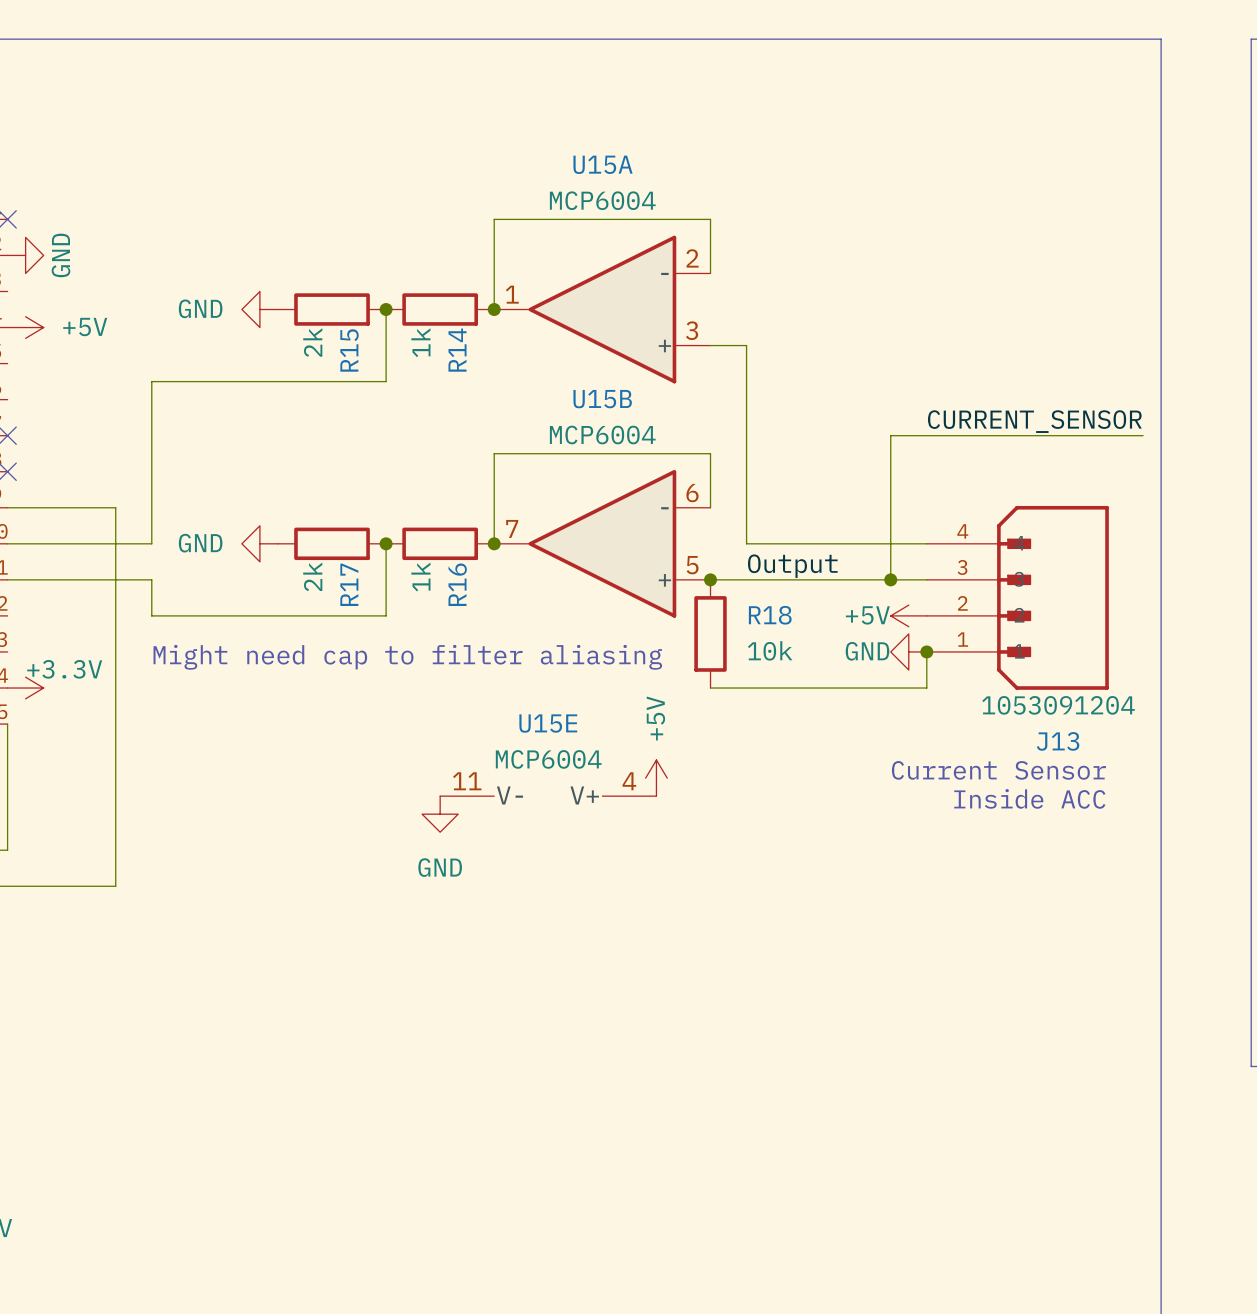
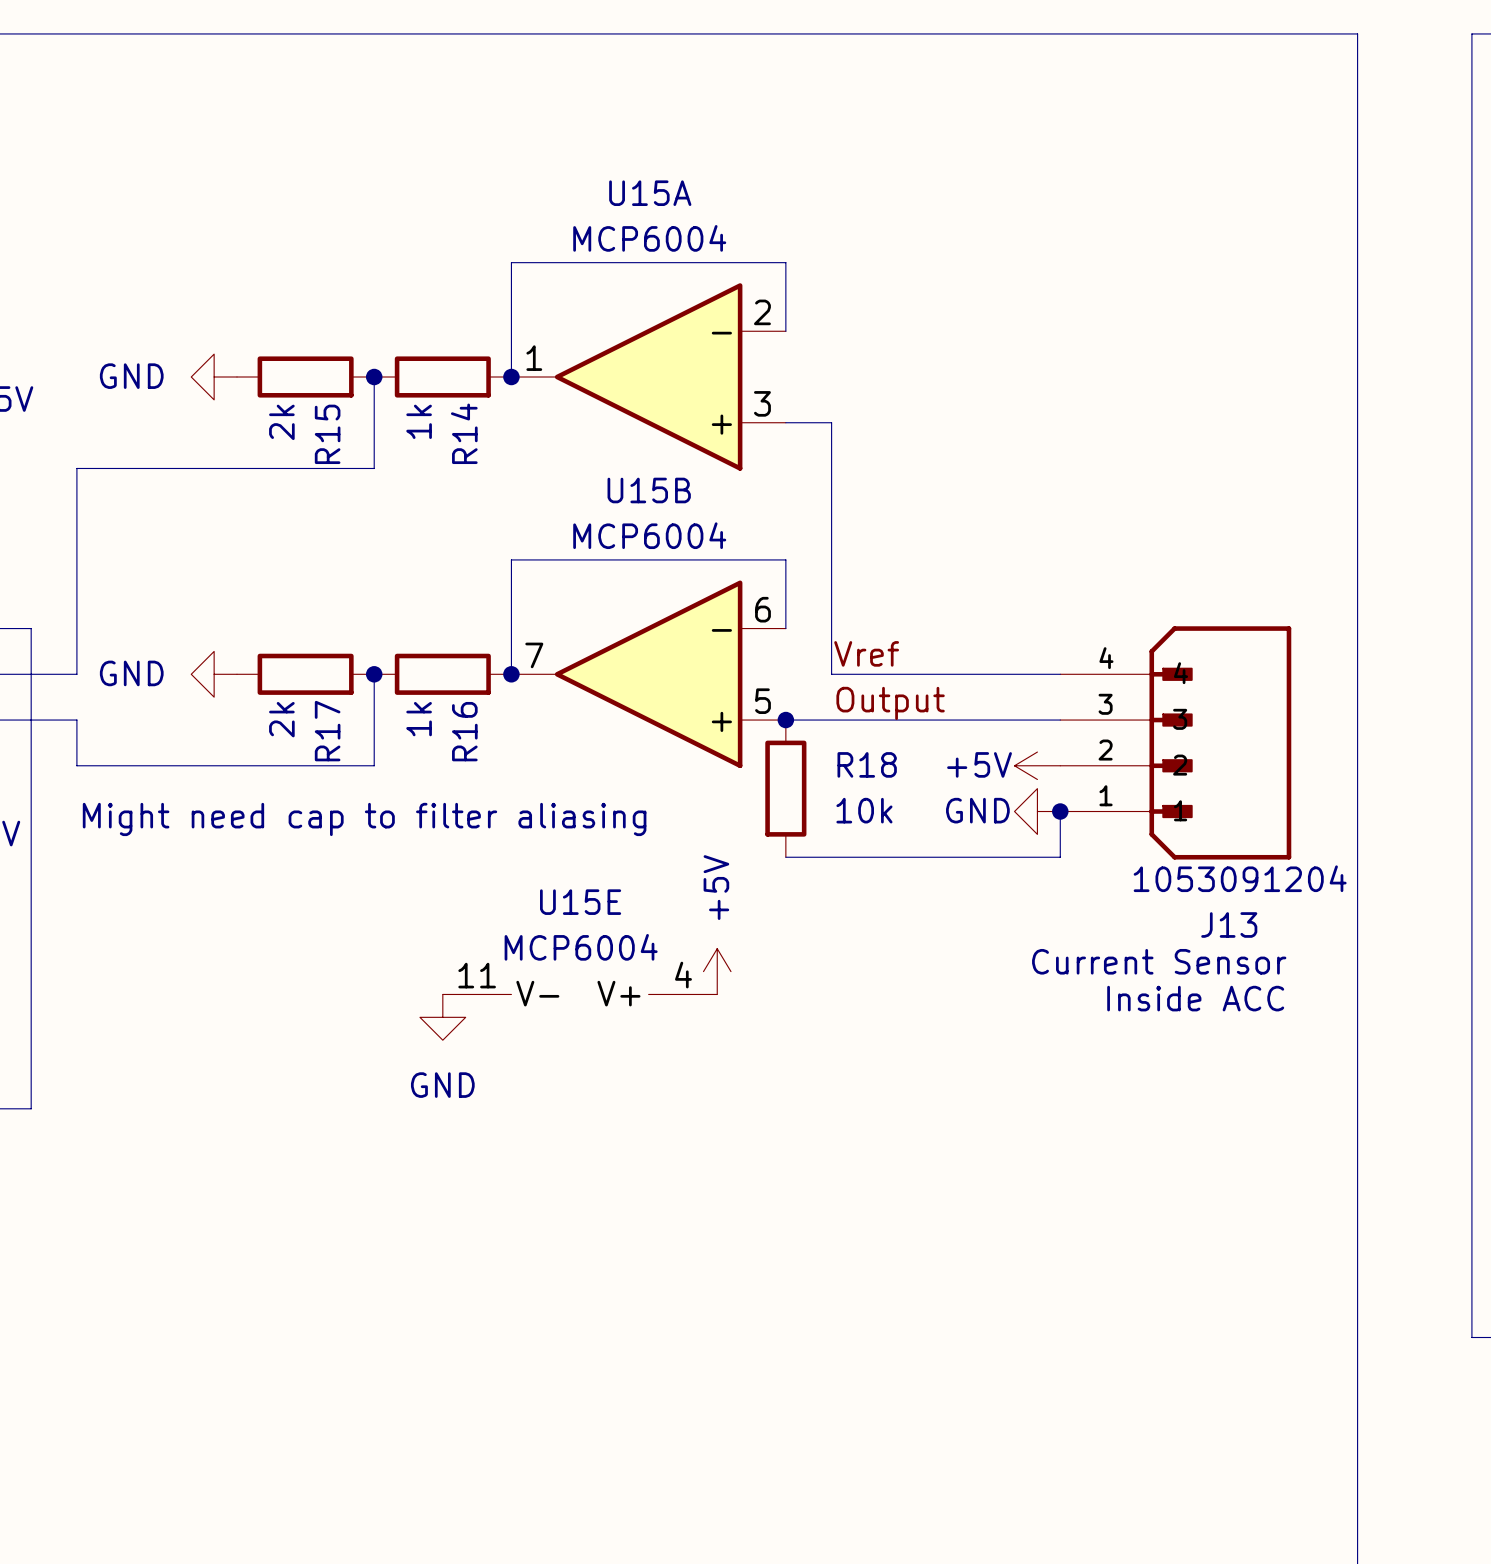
label: CURRENT_SENSOR (1034, 421) -> none
wire: (1143, 435) (890, 435) (890, 579) -> none
label: none -> Vref (866, 653)
junction: (890, 579) -> none

